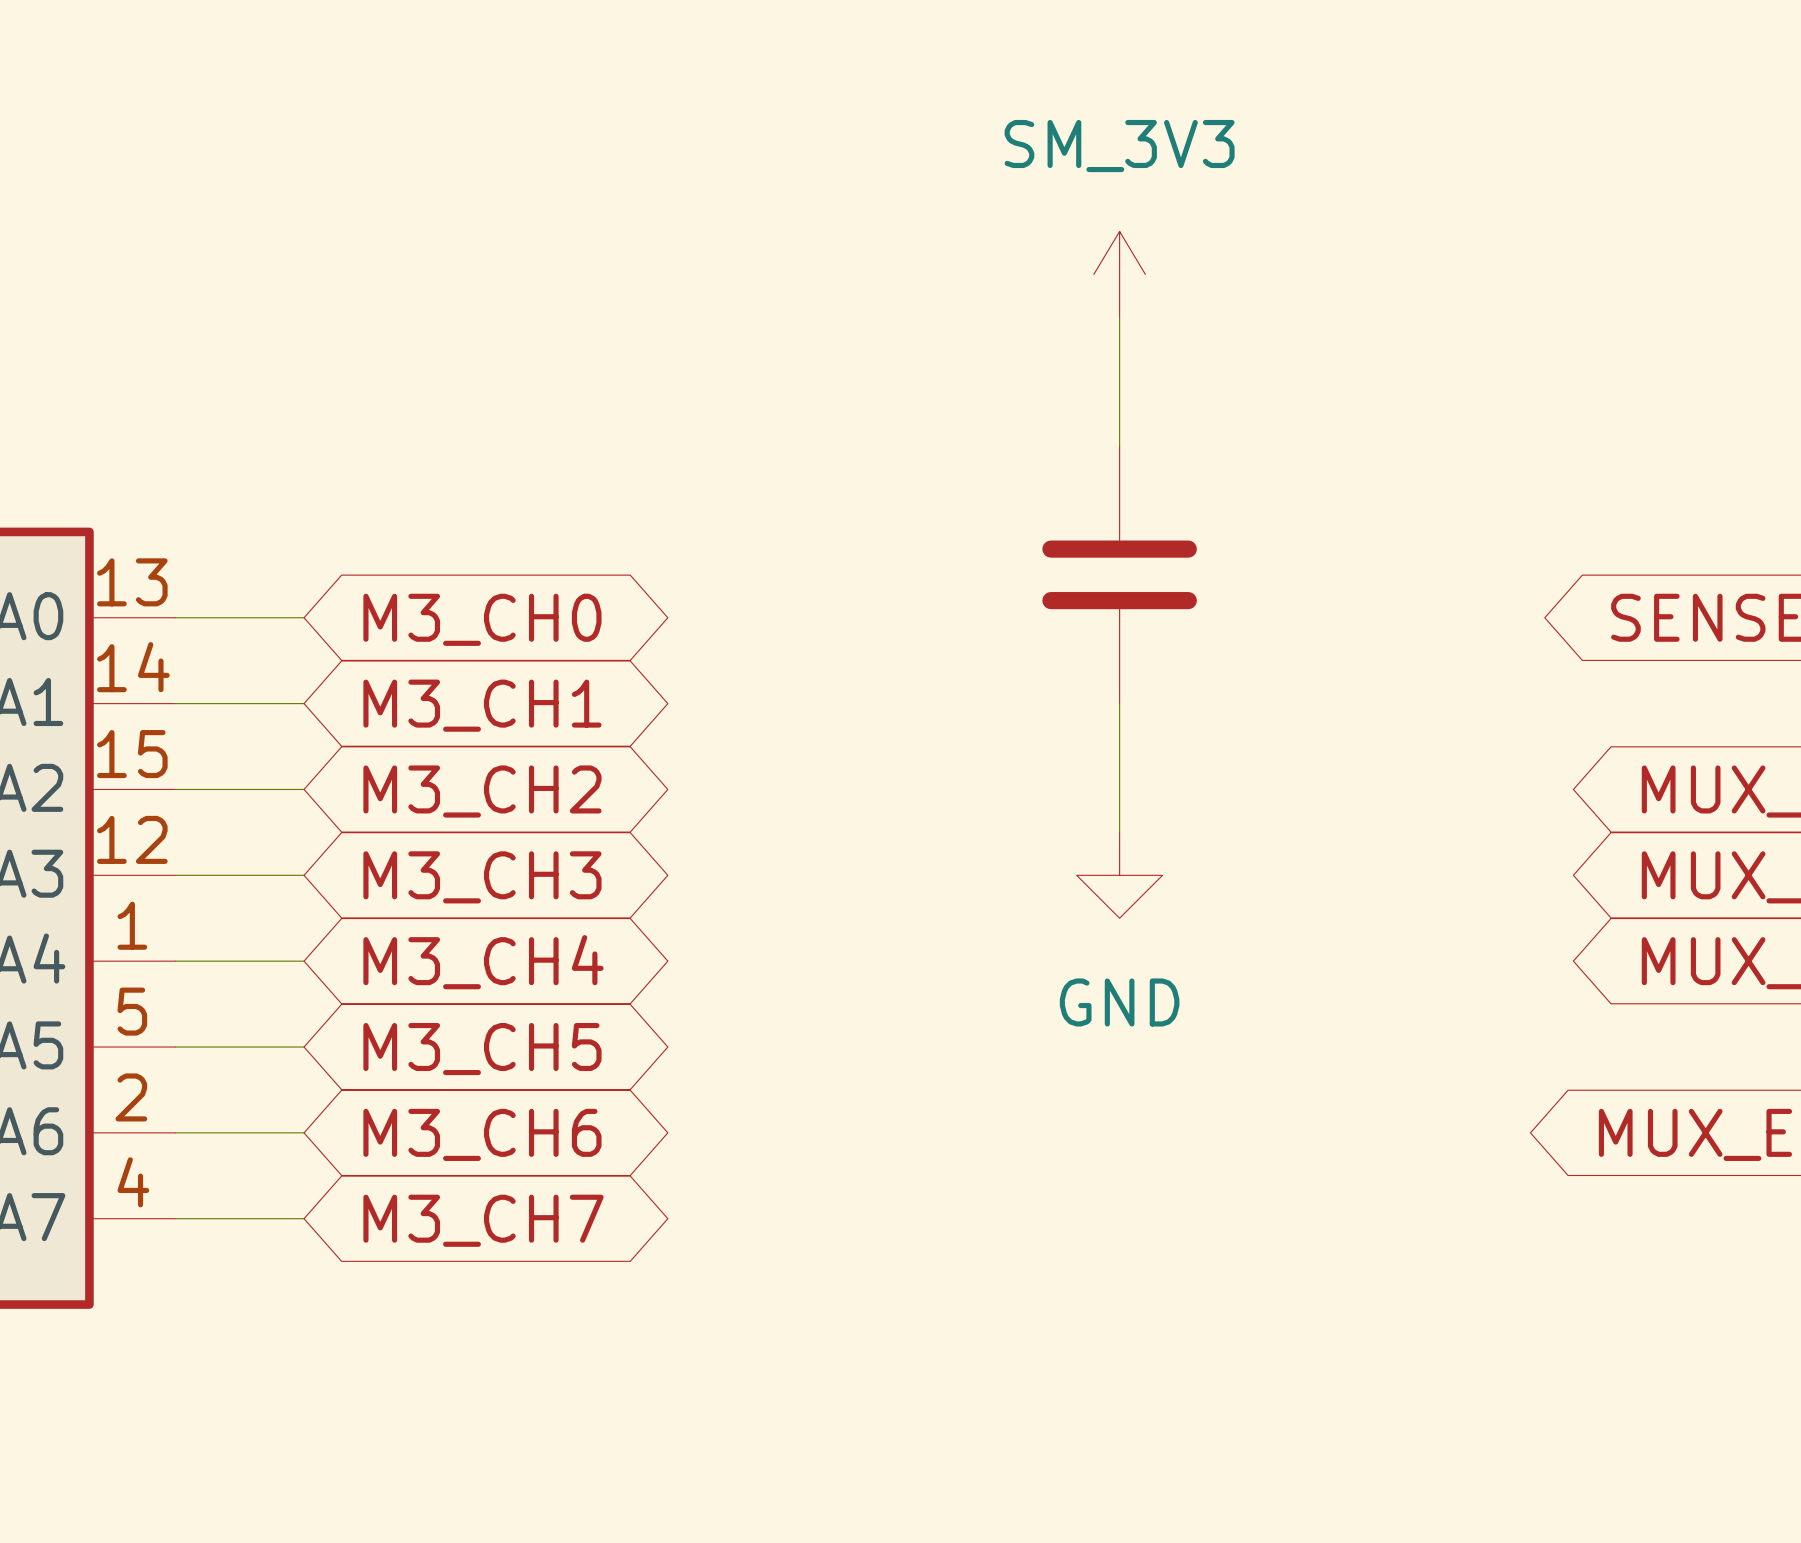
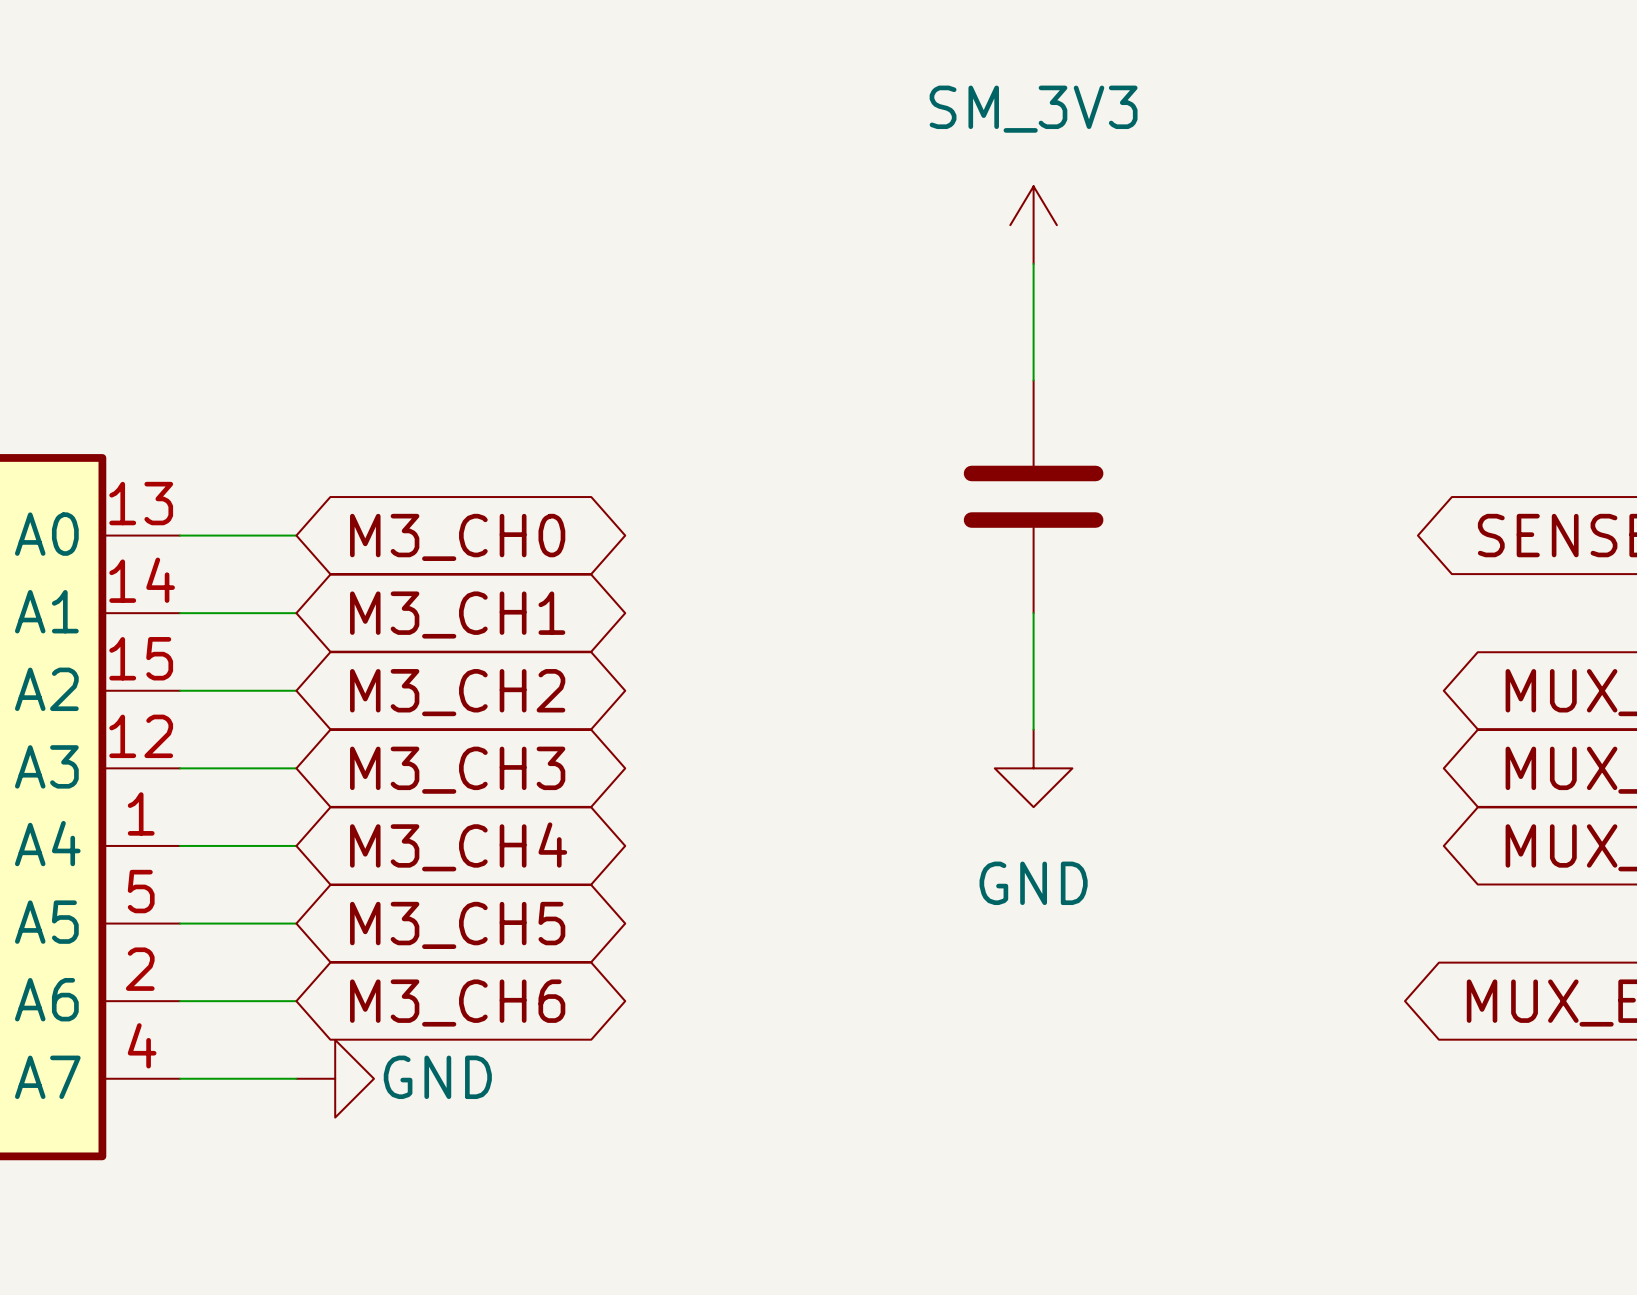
power symbol: none -> GND (335, 1078)
global label: M3_CH7 (483, 1220) -> none

